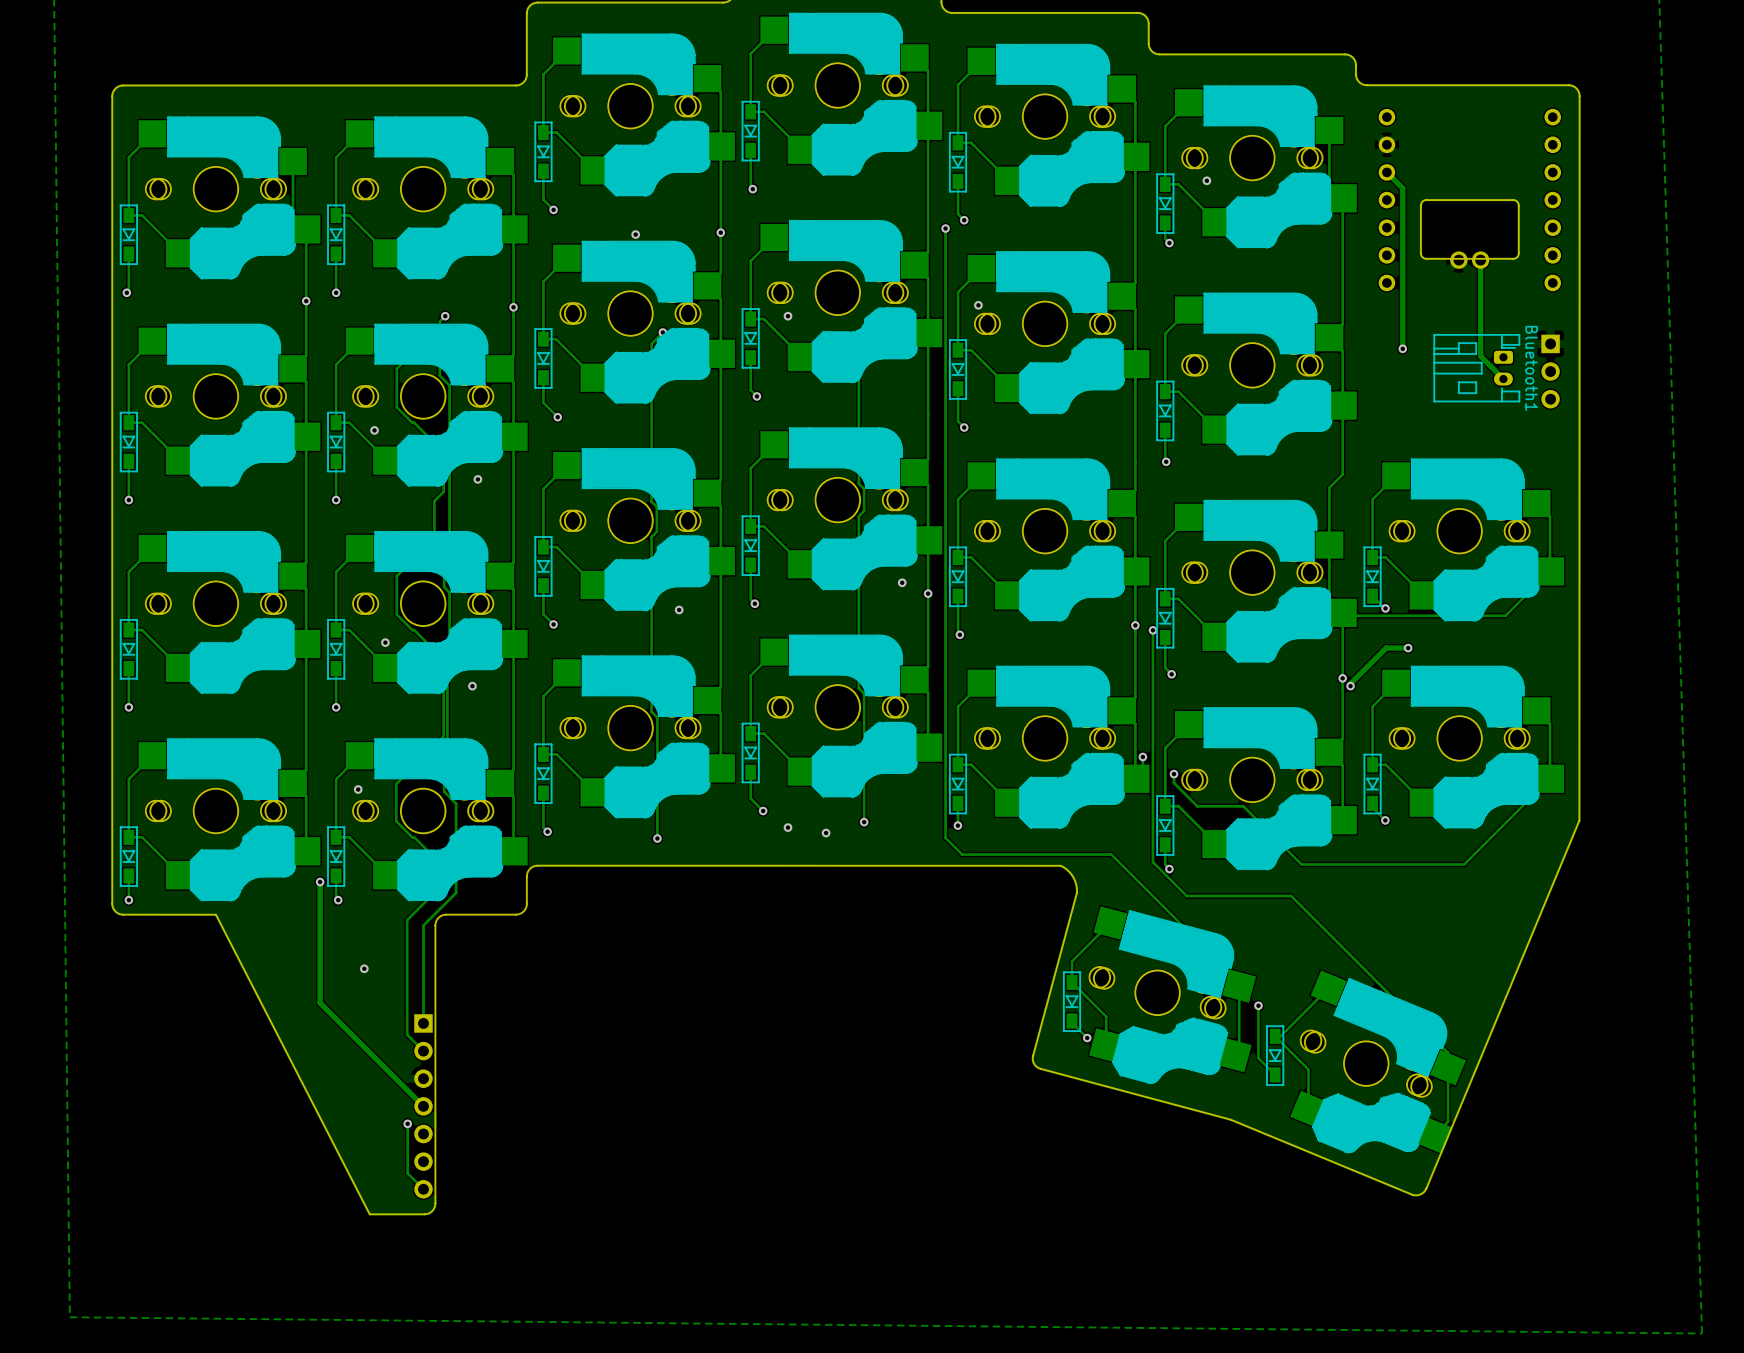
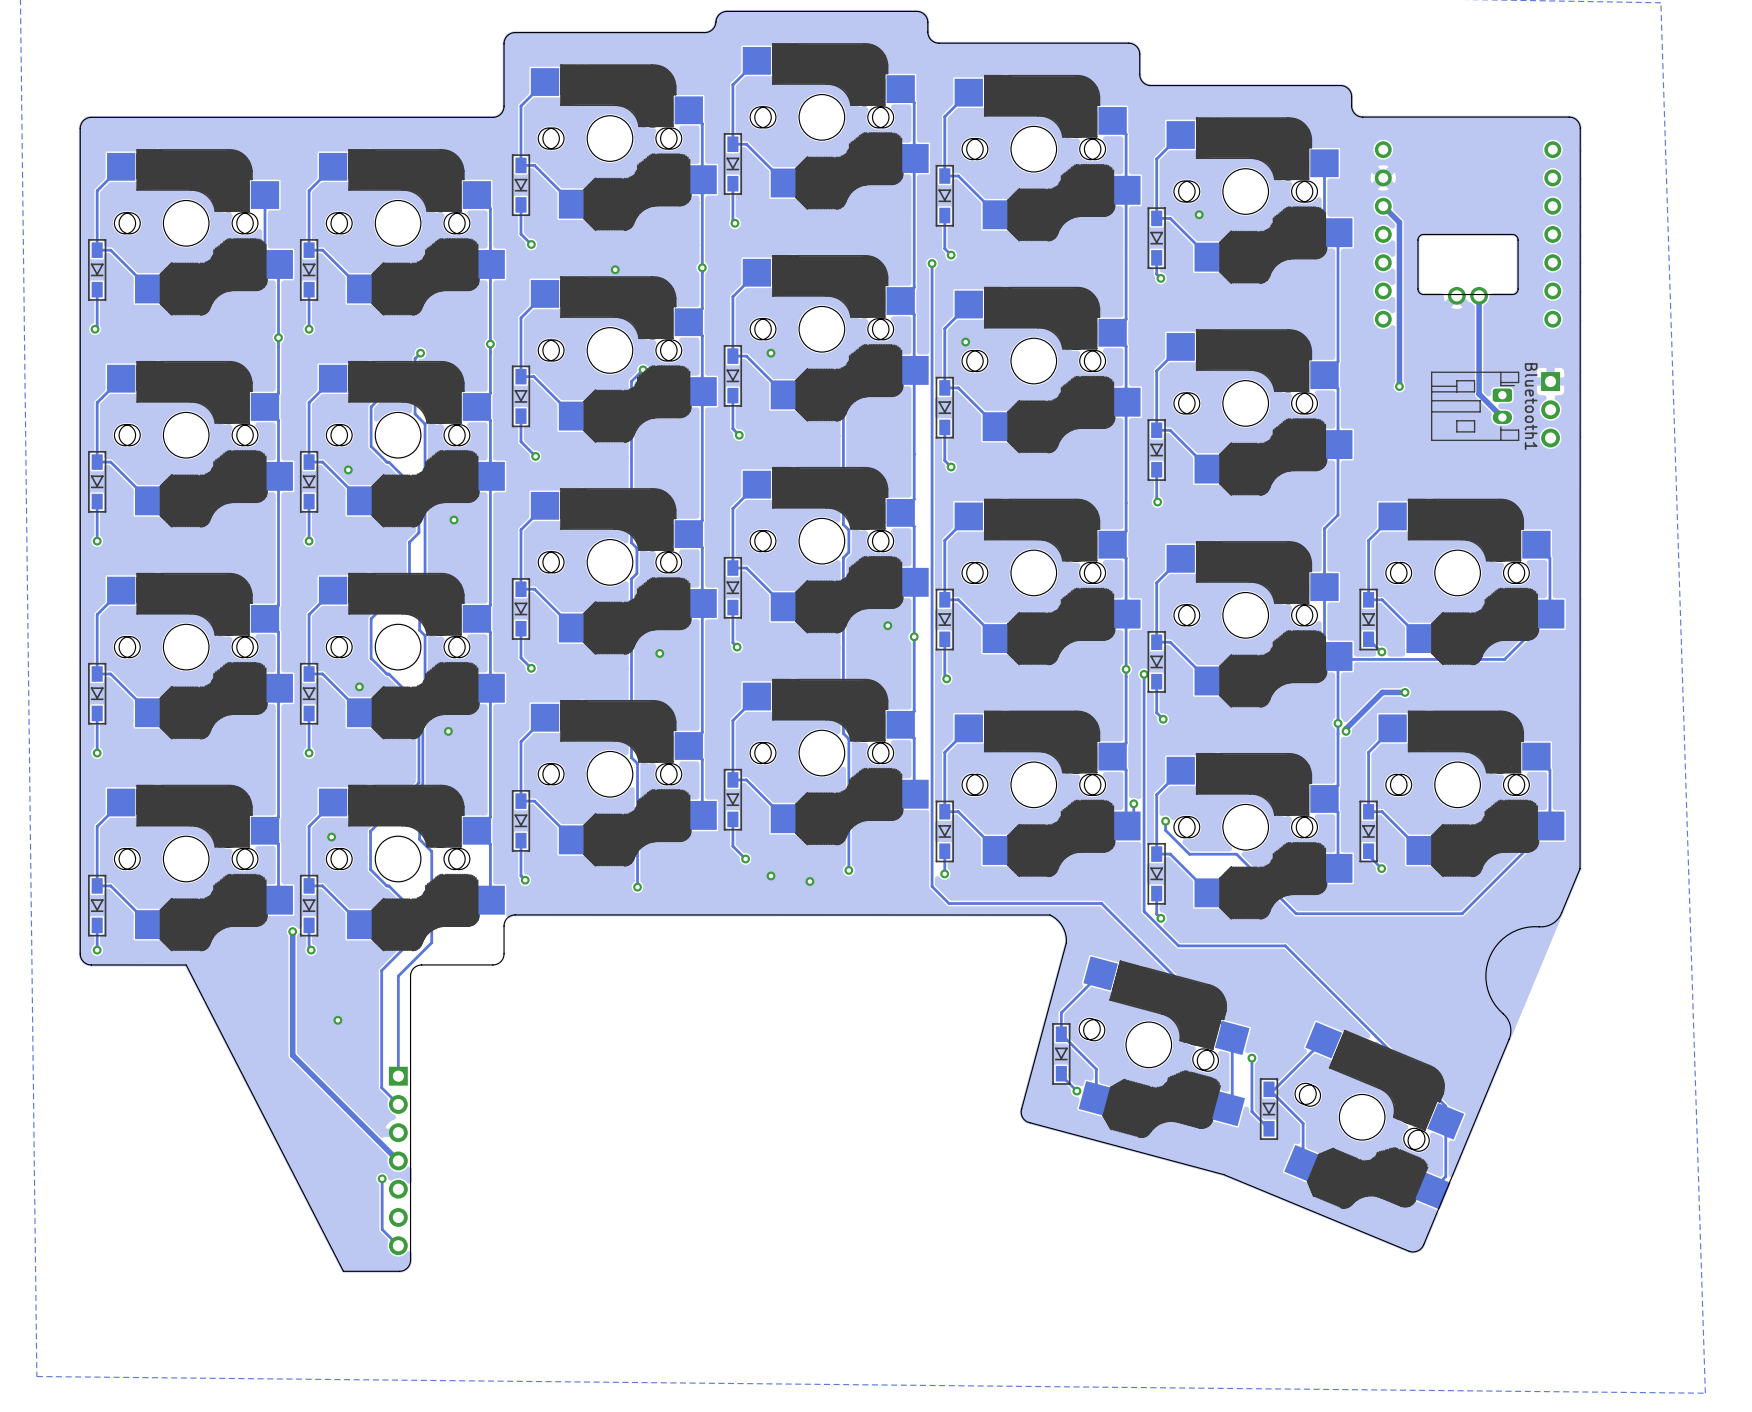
board edge: (1561, 863) (1510, 987) -> (1561, 913) (1556, 920) (1550, 924) (1527, 927) (1511, 932) (1498, 942) (1489, 957) (1485, 973) (1487, 990) (1495, 1005) (1509, 1022) (1510, 1030) (1509, 1039)

